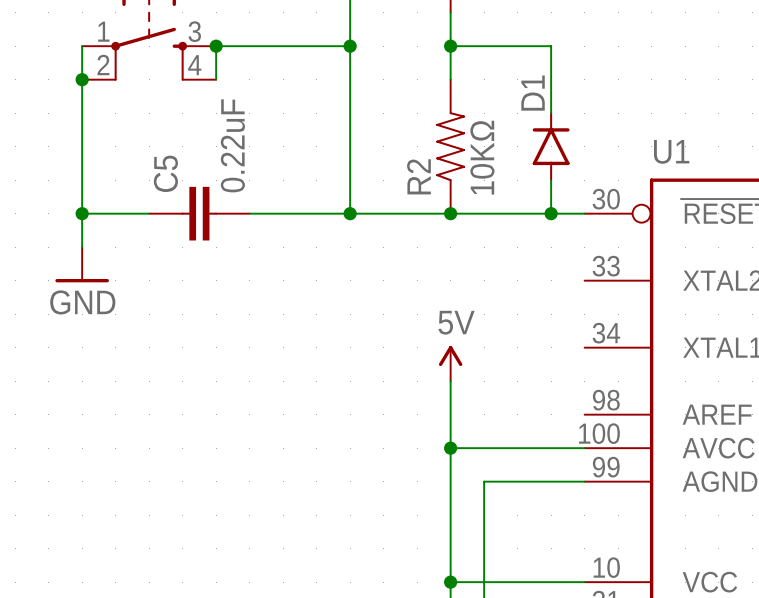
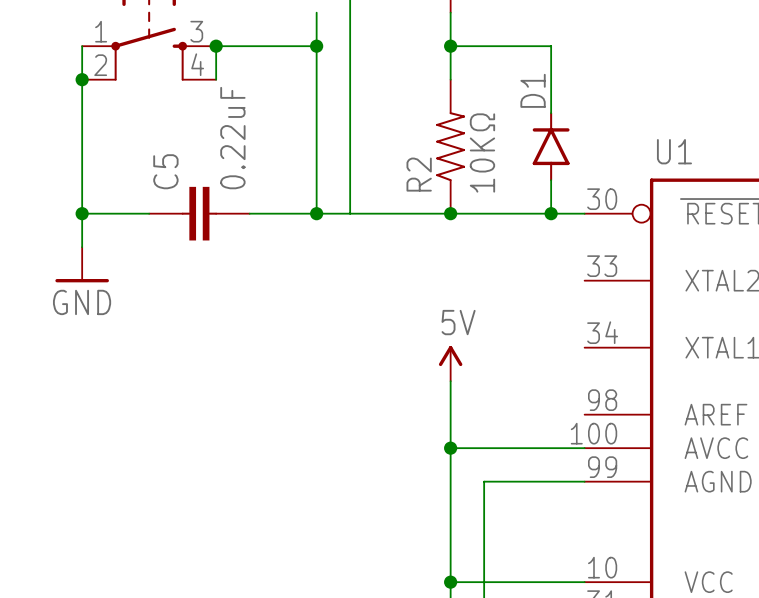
wire: none -> (316, 12) (316, 213)
wire: (316, 46) (350, 46) -> none
junction position: (350, 46) -> (316, 46)
junction position: (350, 213) -> (316, 213)

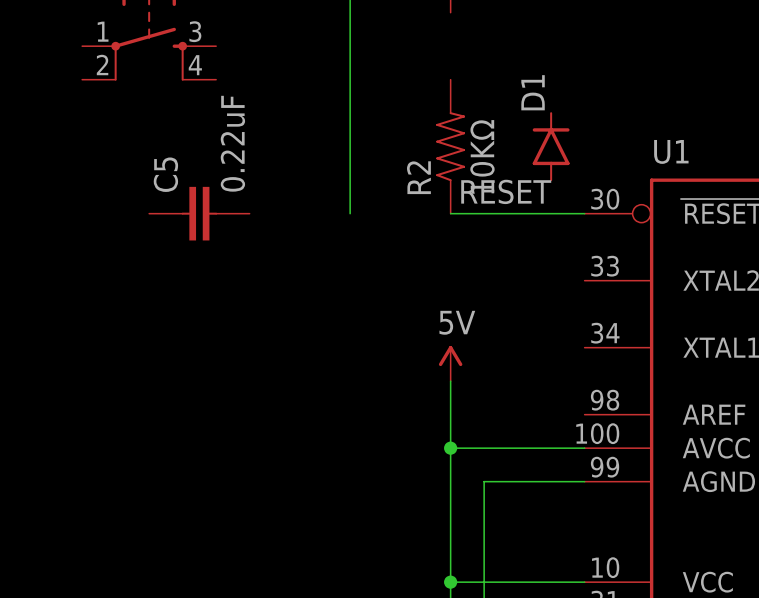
wire: (316, 12) (316, 213) -> none
wire: (450, 12) (450, 79) -> none
wire: (82, 46) (82, 247) -> none
junction: (216, 46) -> none
wire: (316, 46) (216, 46) (216, 79) -> none
junction: (316, 46) -> none
wire: (450, 46) (551, 46) (551, 113) -> none
junction: (450, 46) -> none
junction: (82, 79) -> none
wire: (551, 180) (551, 213) -> none
label: none -> RESET (506, 191)
wire: (82, 213) (149, 213) -> none
junction: (82, 213) -> none
wire: (249, 213) (450, 213) -> none
junction: (316, 213) -> none
junction: (450, 213) -> none
junction: (551, 213) -> none
power symbol: GND (82, 264) -> none

